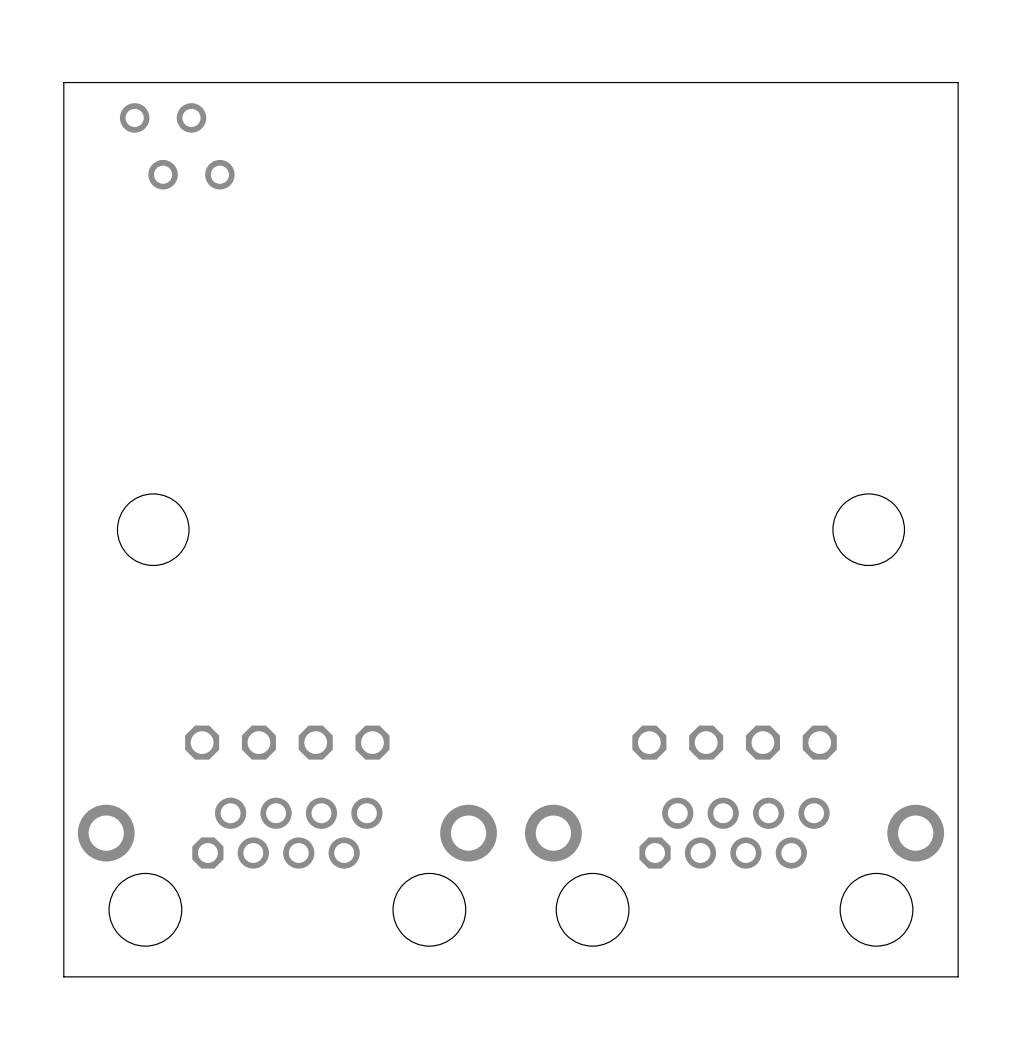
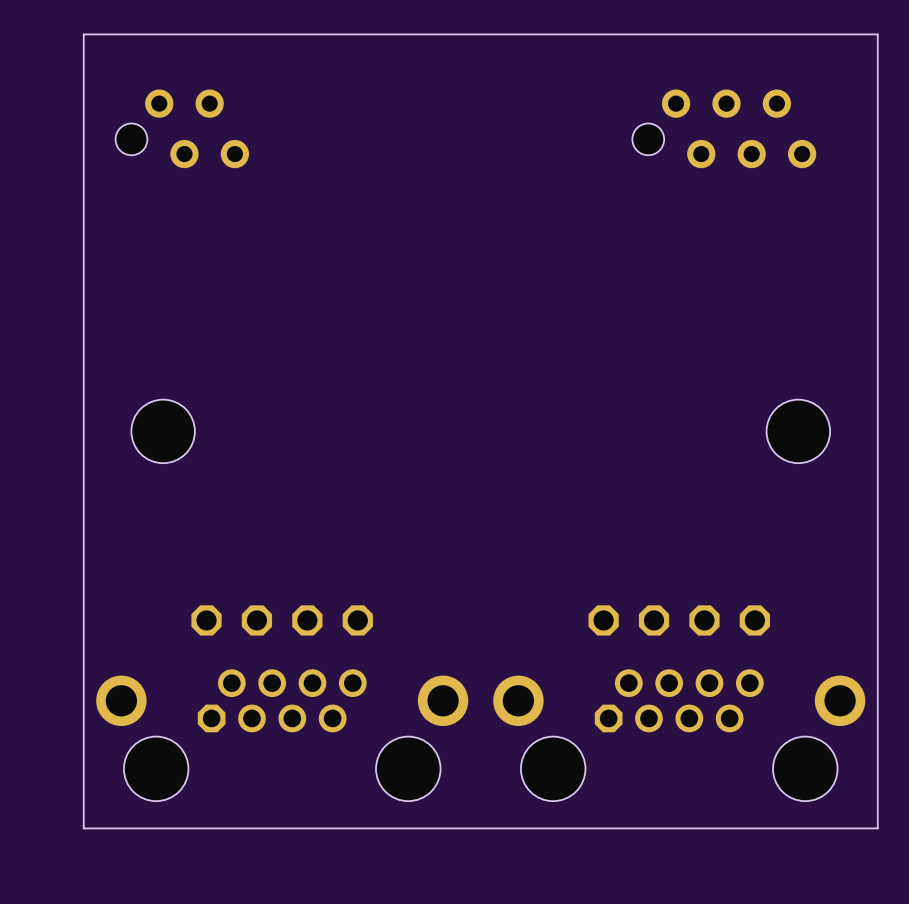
part: (177, 146) -> none
part: none -> (182, 128)
part: none -> (724, 128)

